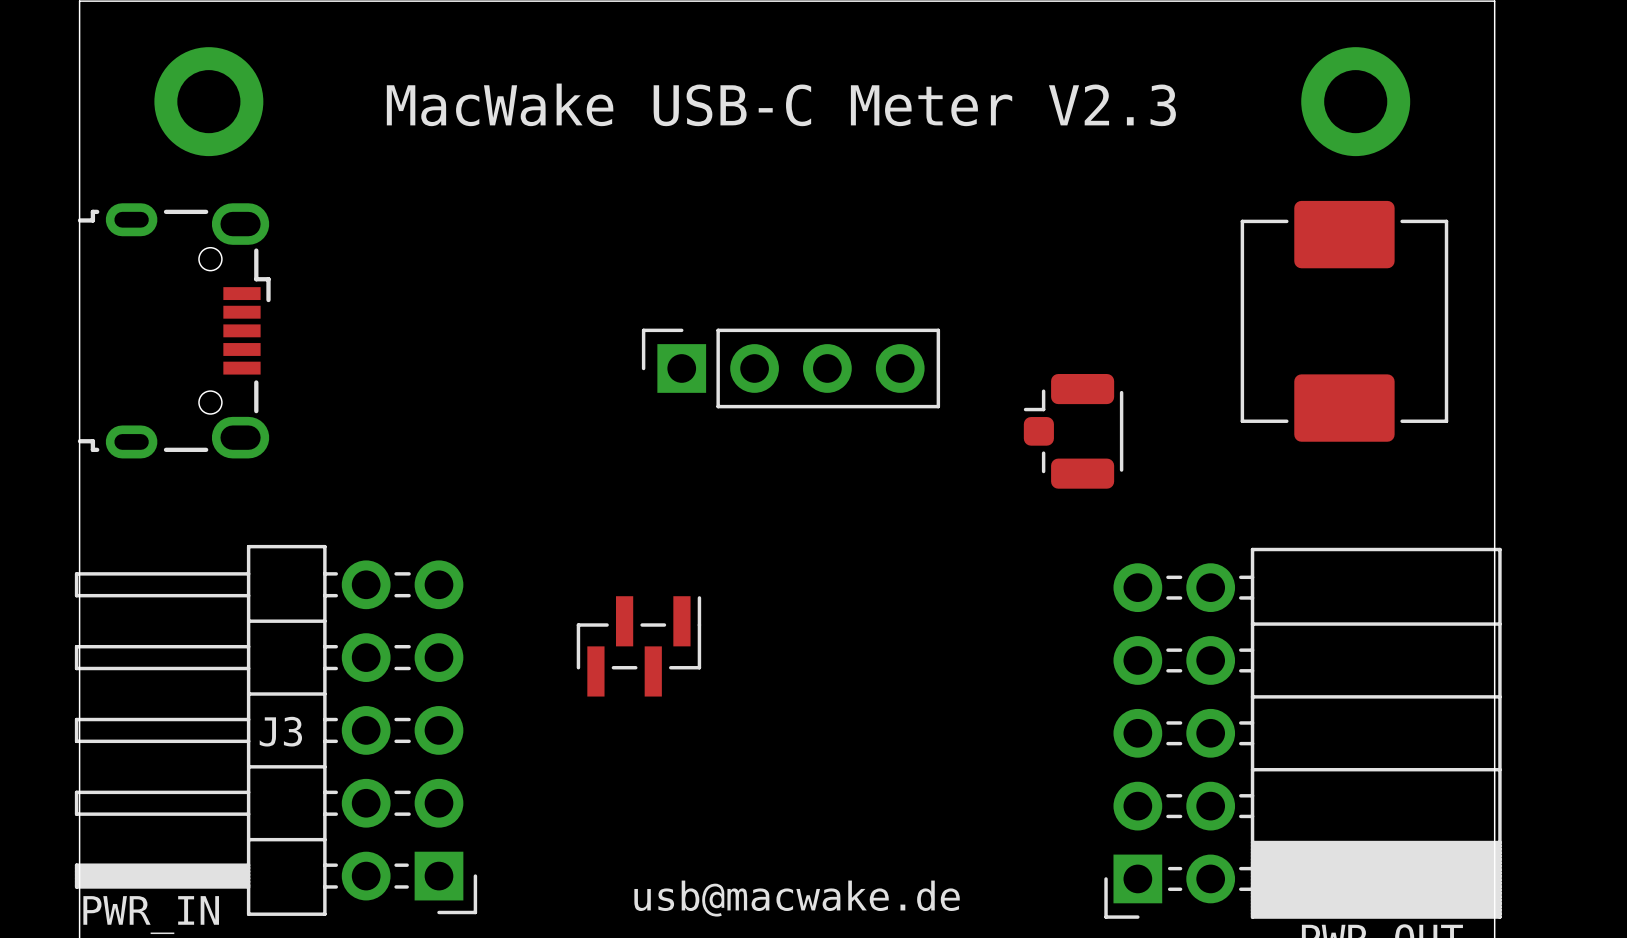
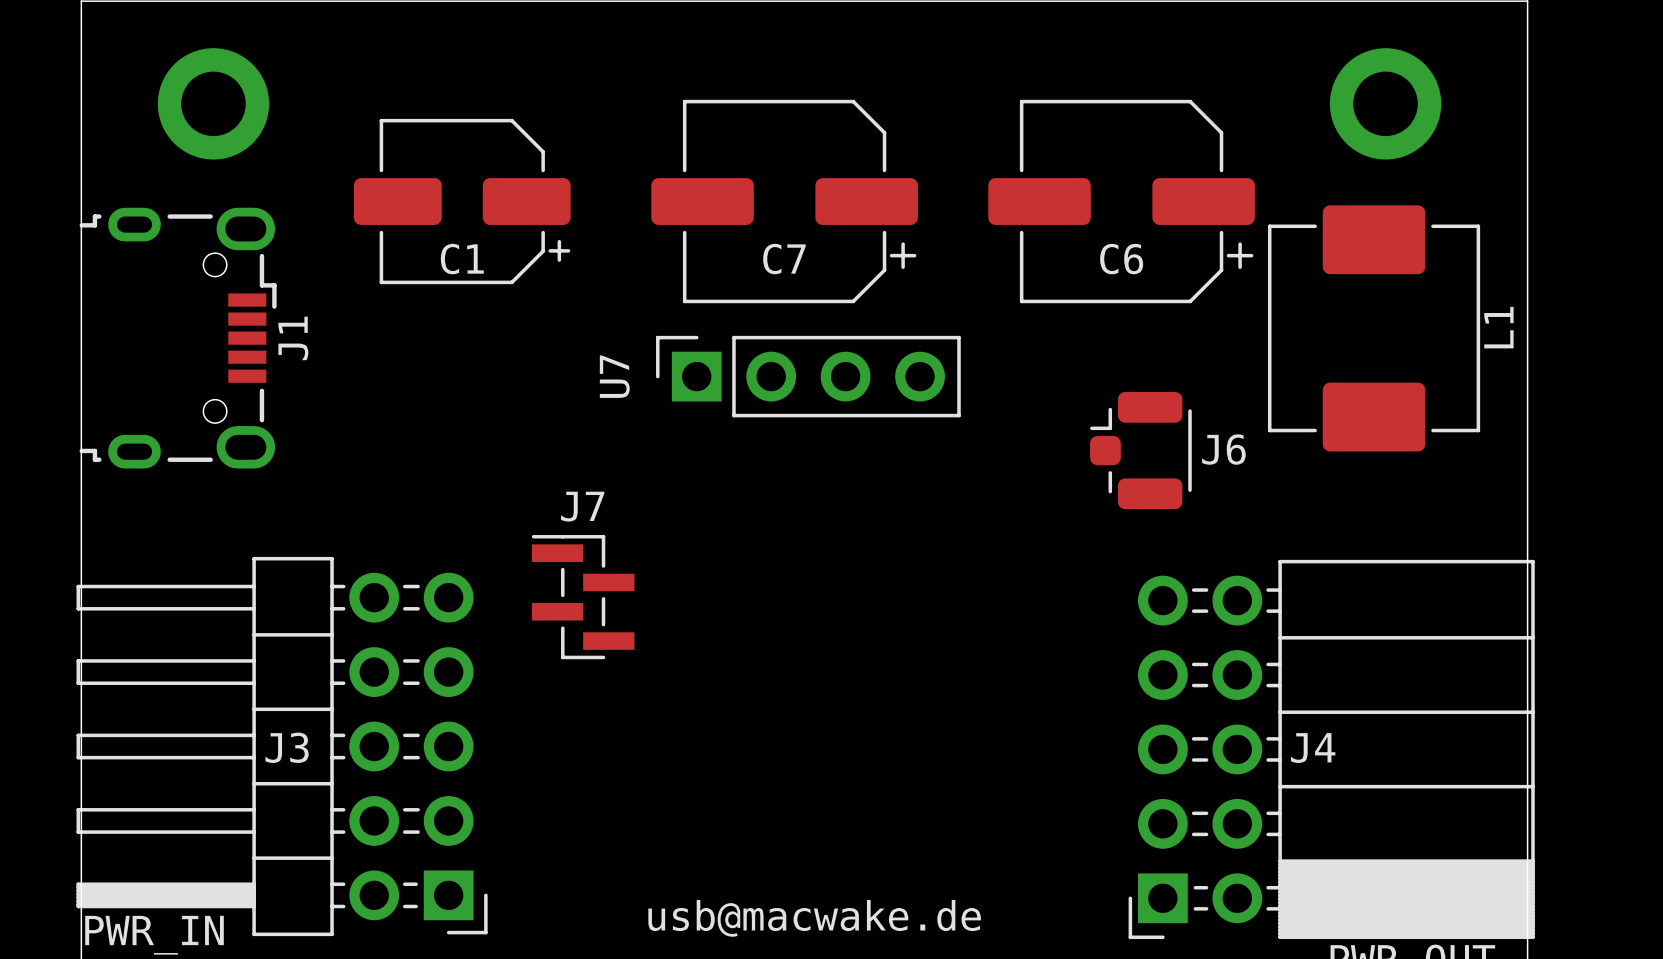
text: MacWake USB-C Meter V2.3 (781, 104) -> none
C1: none -> (462, 201)
C7: none -> (784, 201)
C6: none -> (1121, 201)
L1 name: none -> L1 (1498, 327)
J1 name: none -> J1 (293, 338)
U7 name: none -> U7 (614, 376)
part: (1073, 431) -> none
J6: none -> (1140, 450)
J7: none -> (583, 597)
part: (638, 646) -> none
J4 name: none -> J4 (1313, 748)

